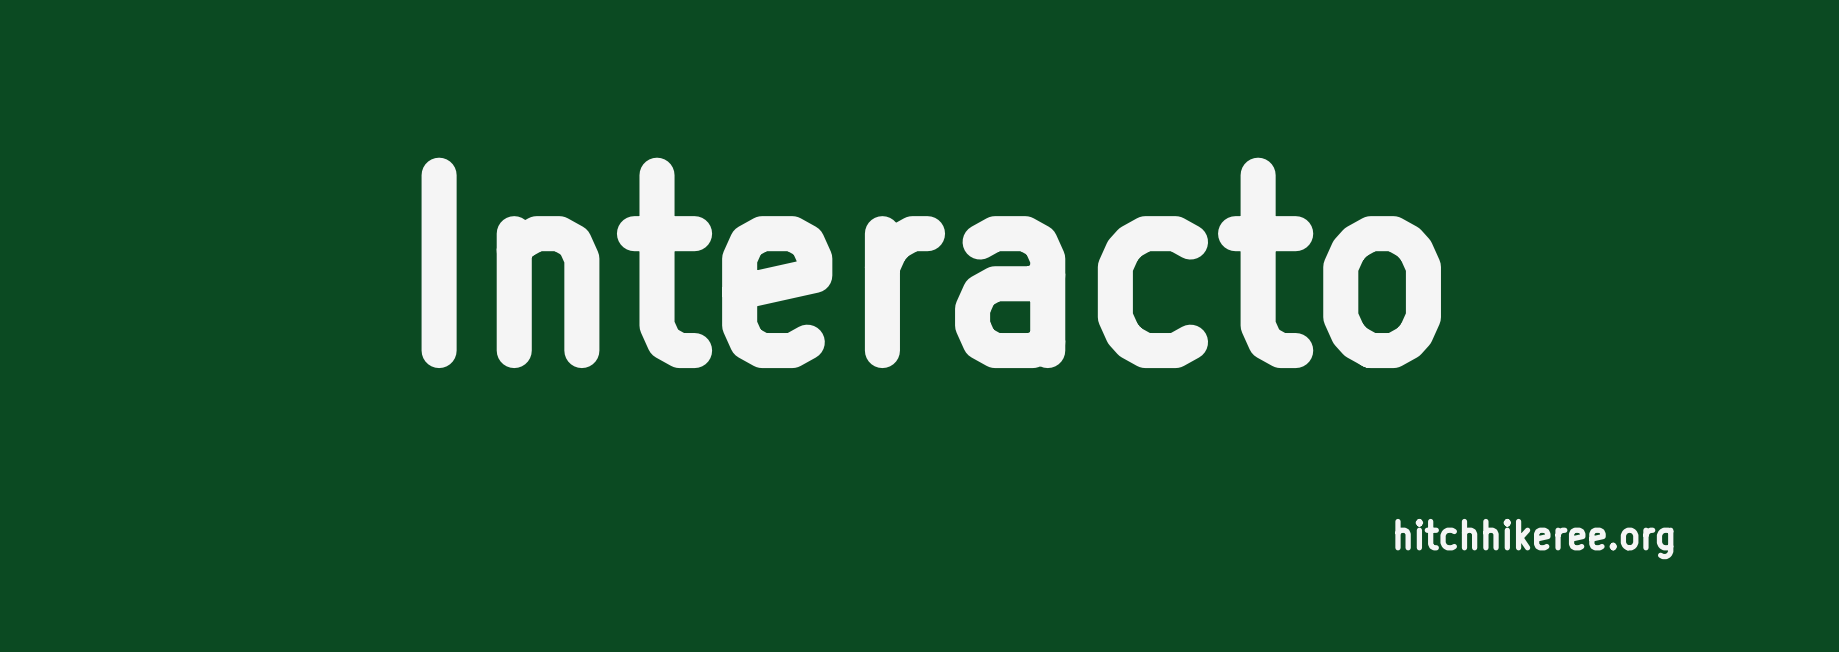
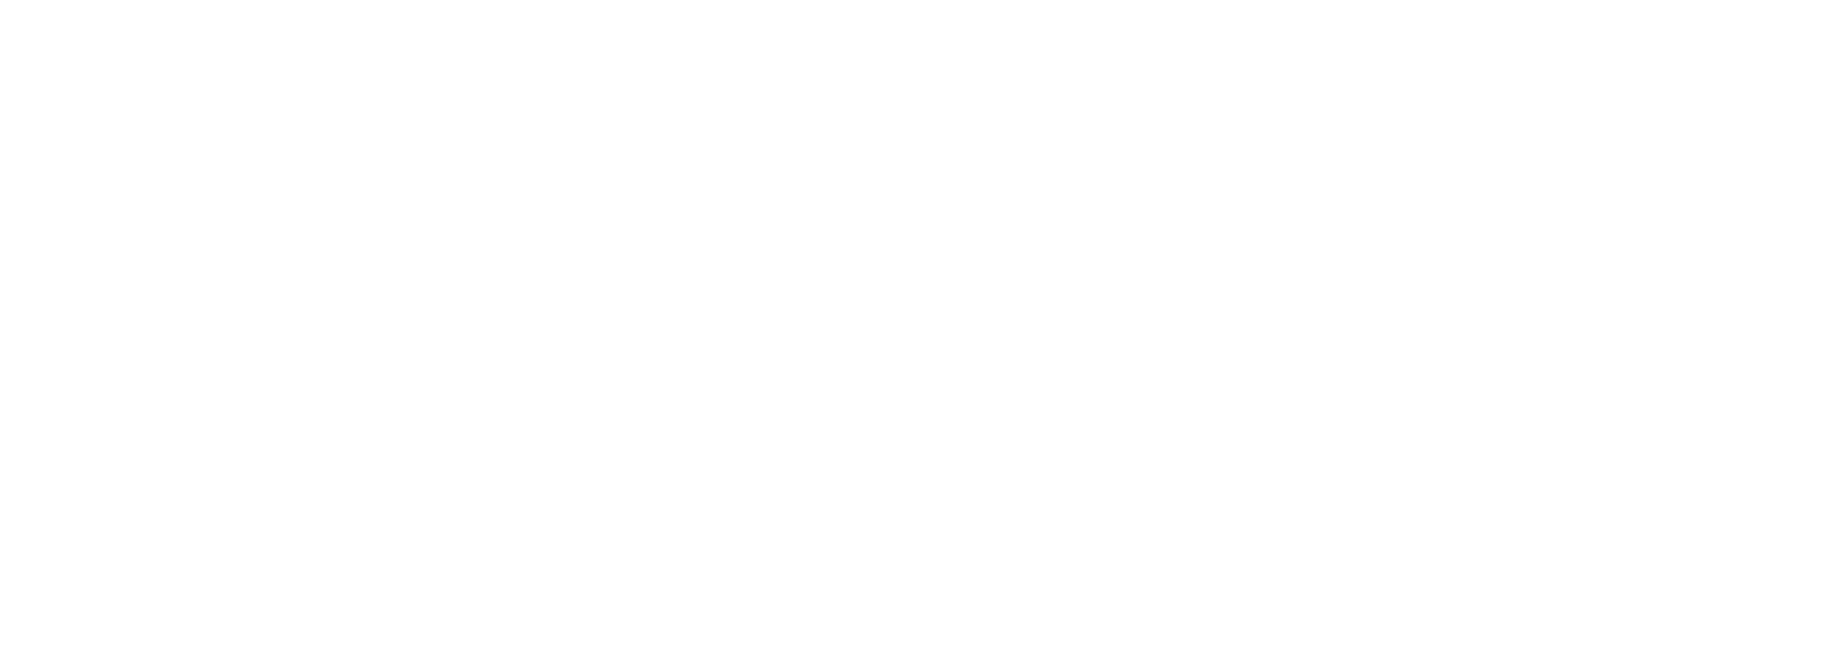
text: Interacto (931, 262) -> none
text: hitchhikeree.org (1534, 539) -> none

